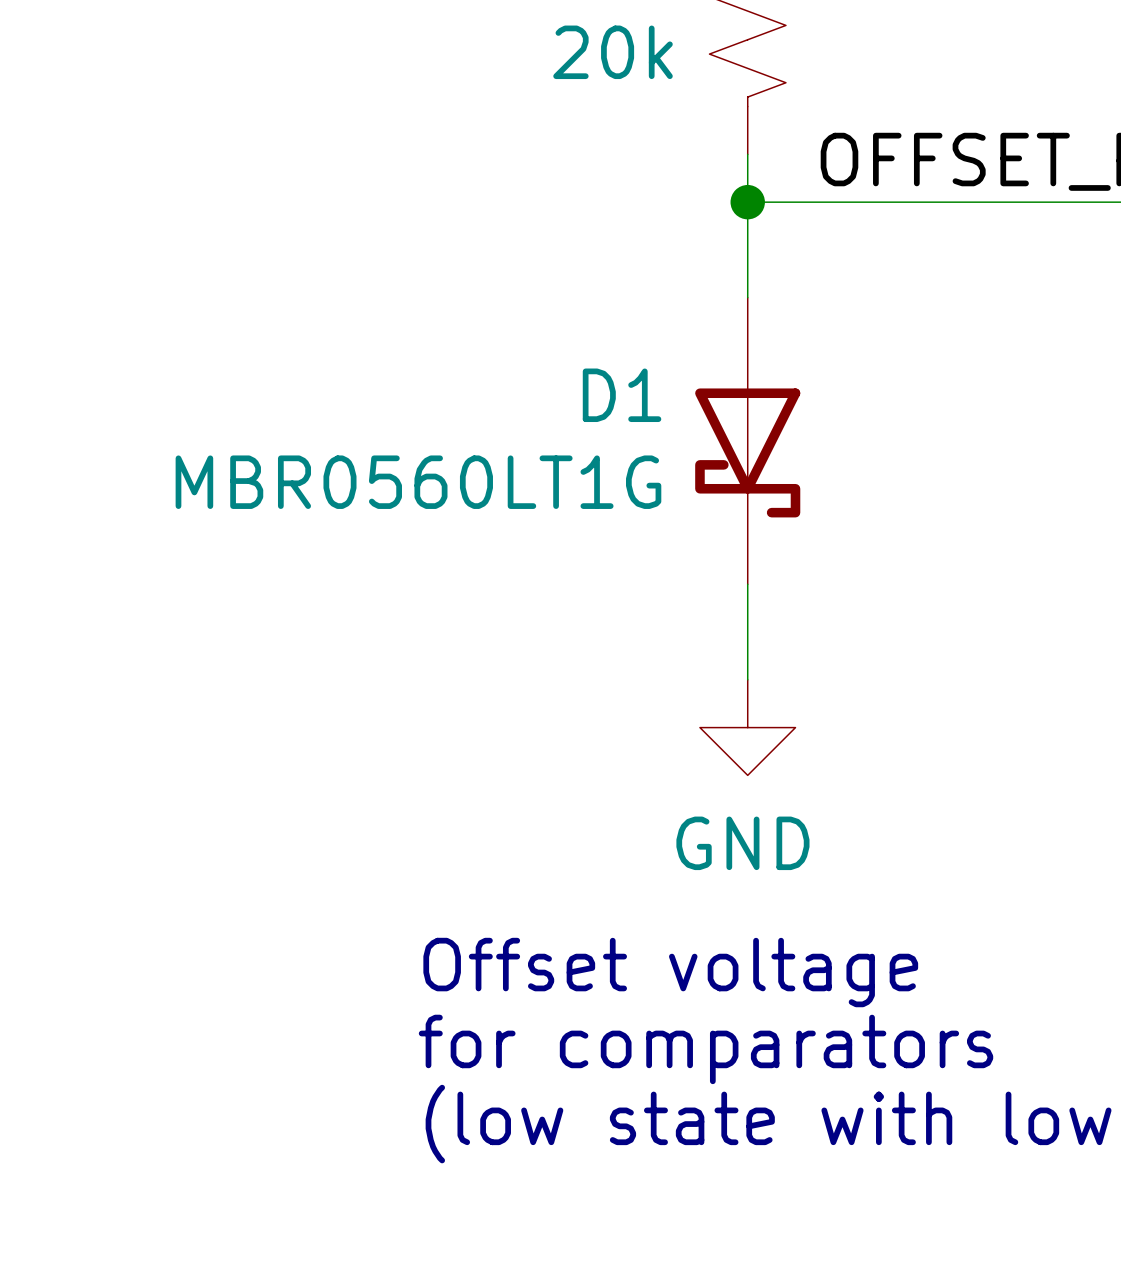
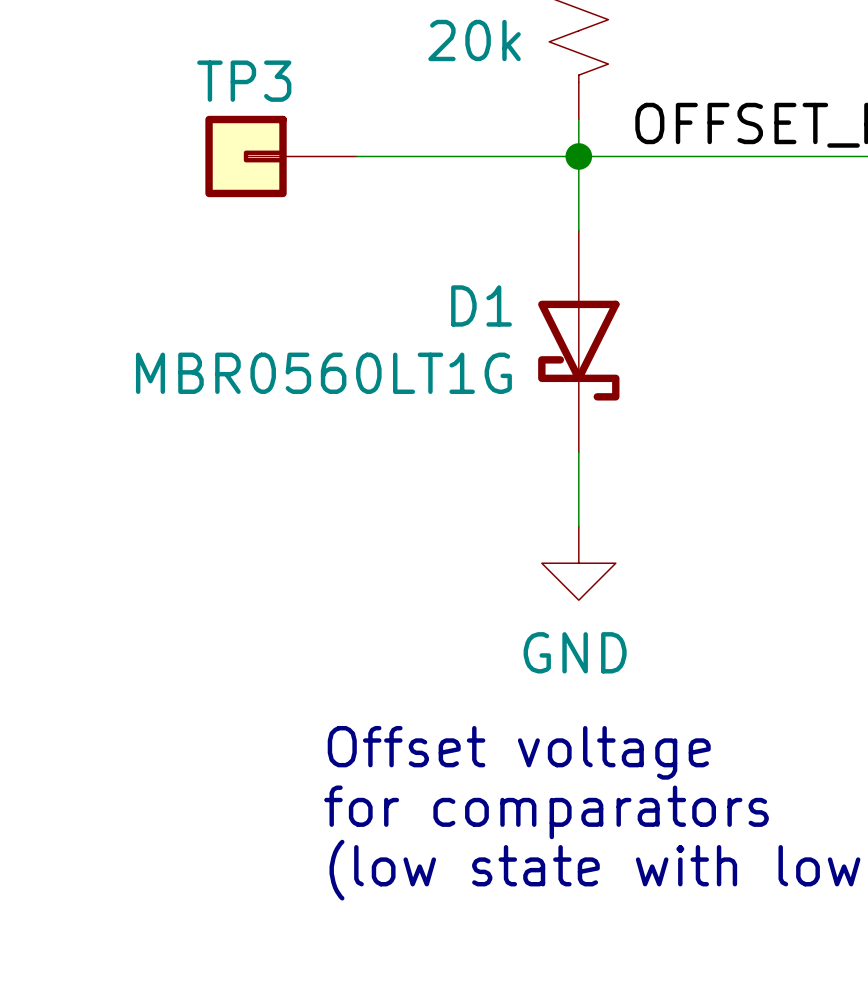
TP3: none -> (281, 156)
wire: none -> (356, 156) (578, 156)

